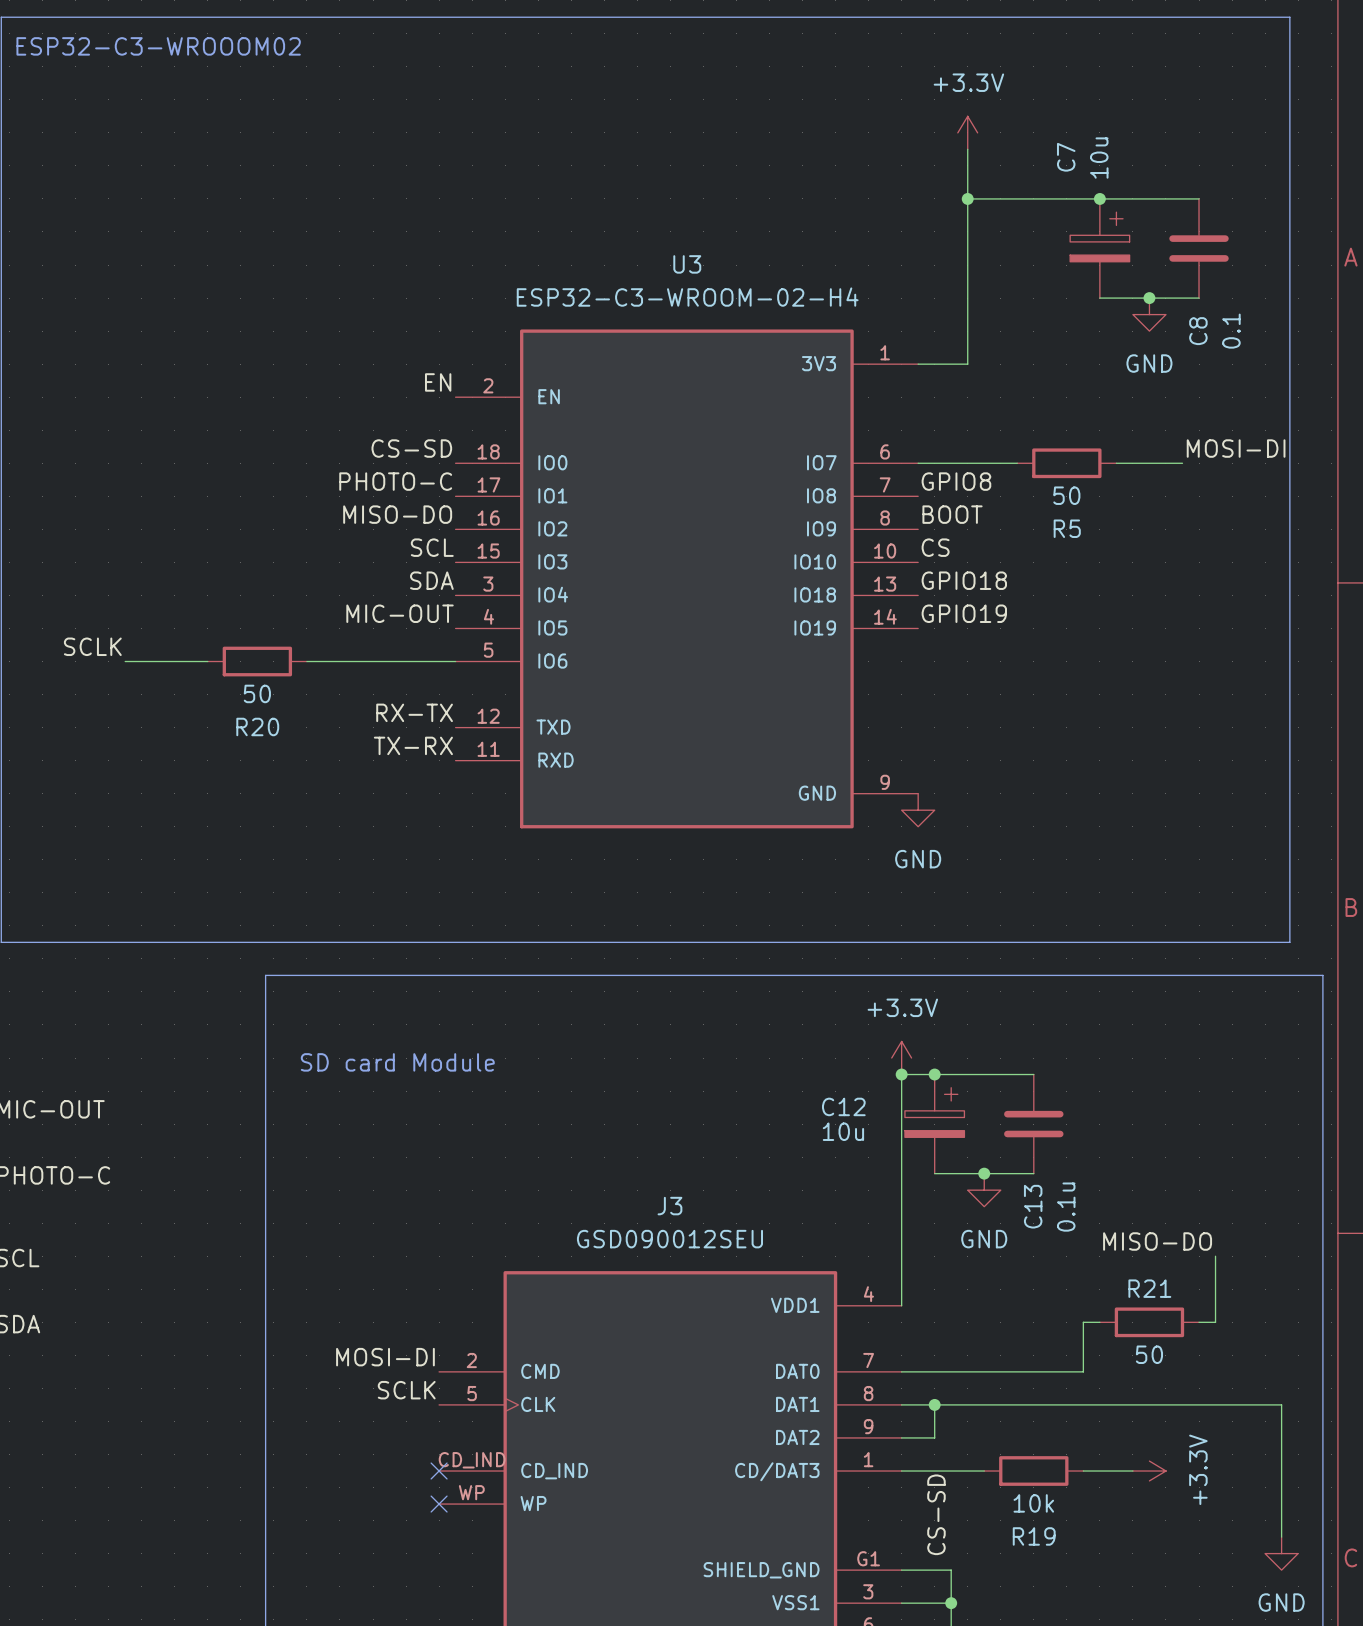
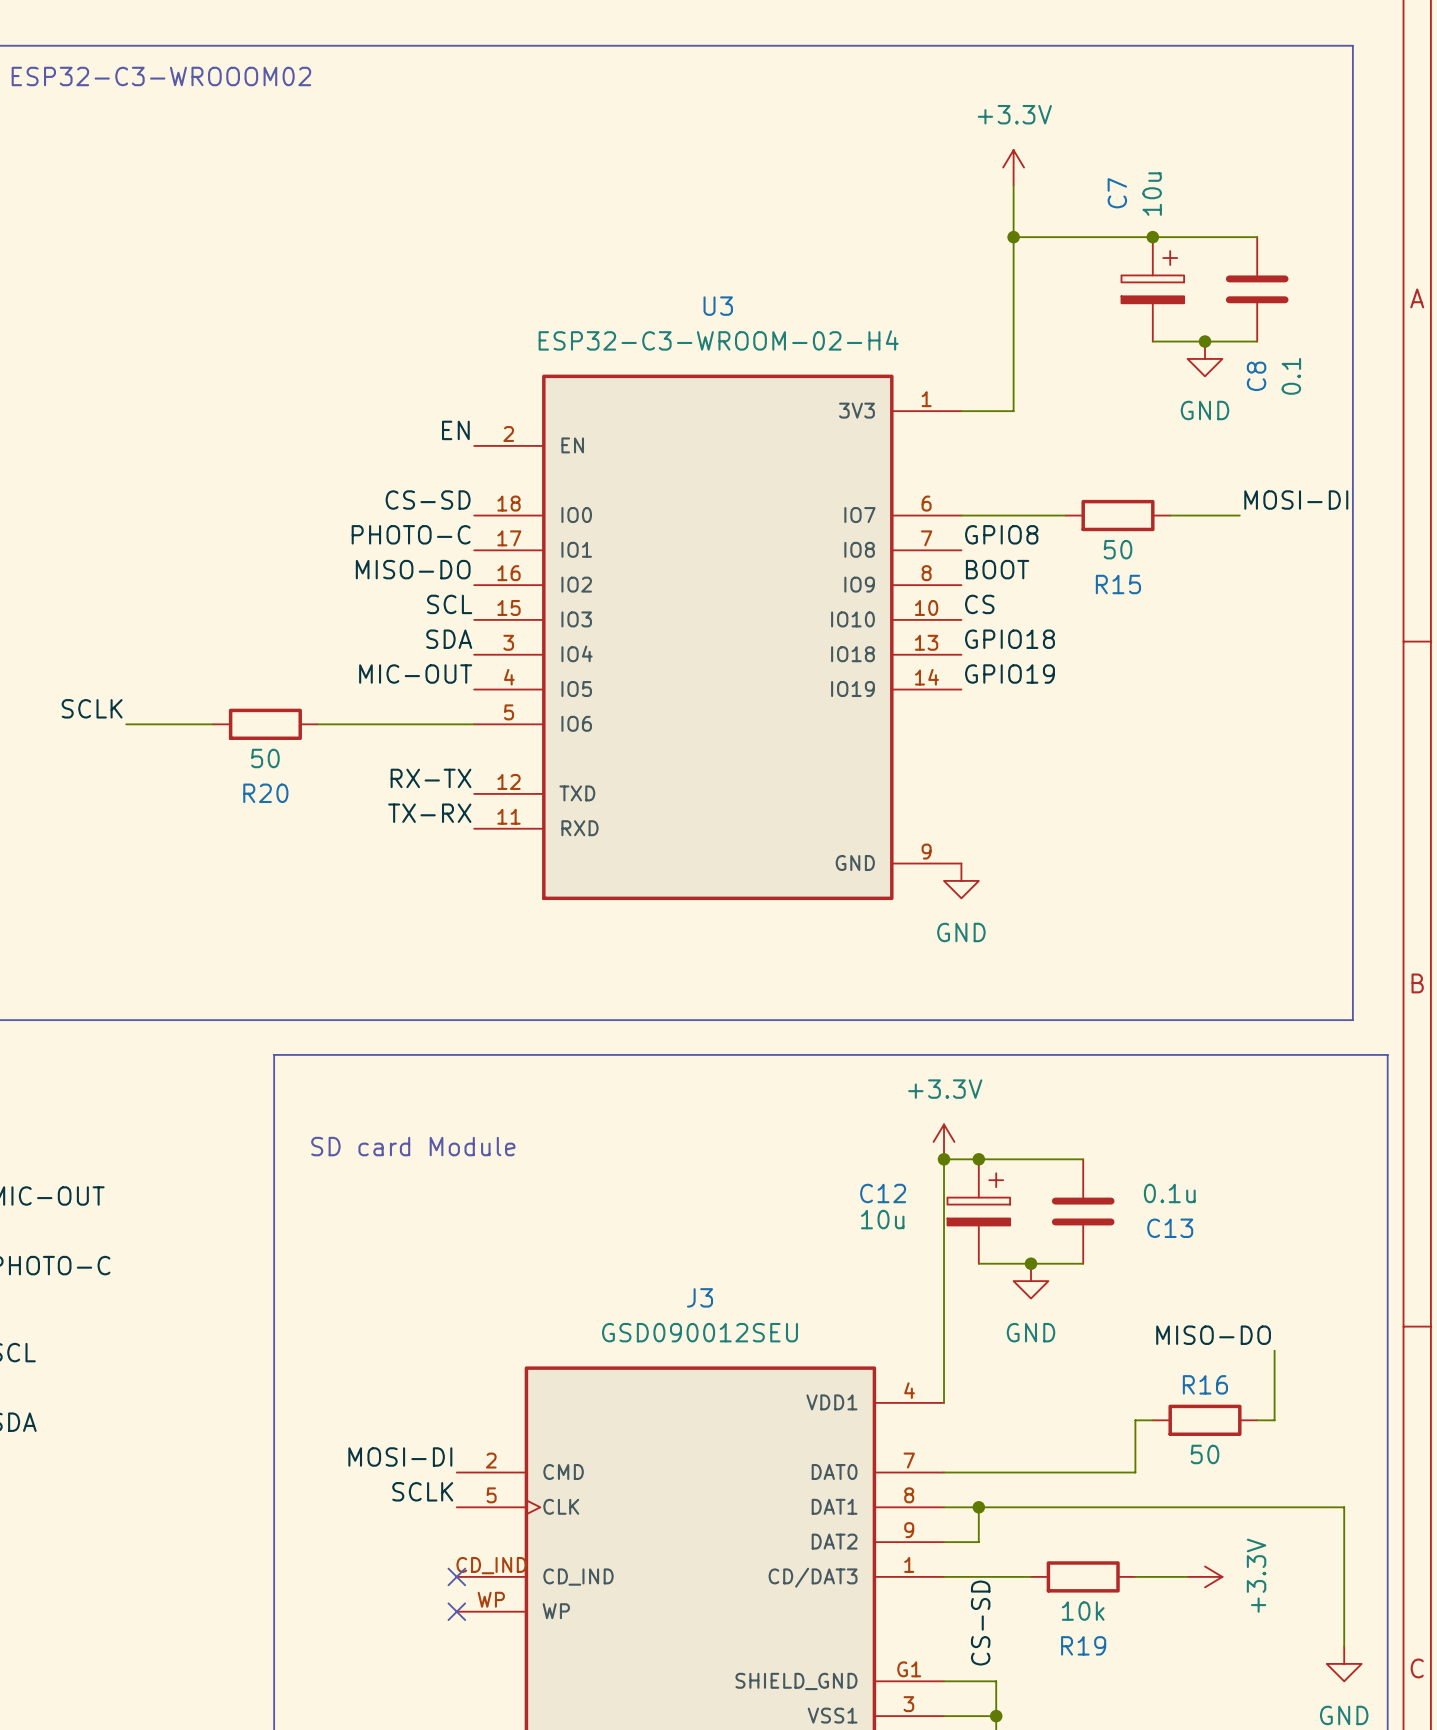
R5 name: R5 (1067, 528) -> R15 (1118, 584)
C13 name rotation: 0° (1033, 1206) -> 90° clockwise (1170, 1228)
C13 name position: C13 (1033, 1206) -> C13 (1170, 1228)
C13 value rotation: 0° (1066, 1207) -> 90° clockwise (1169, 1193)
C13 value position: 0.1u (1066, 1207) -> 0.1u (1169, 1193)
R21 name: R21 (1149, 1288) -> R16 (1205, 1384)

